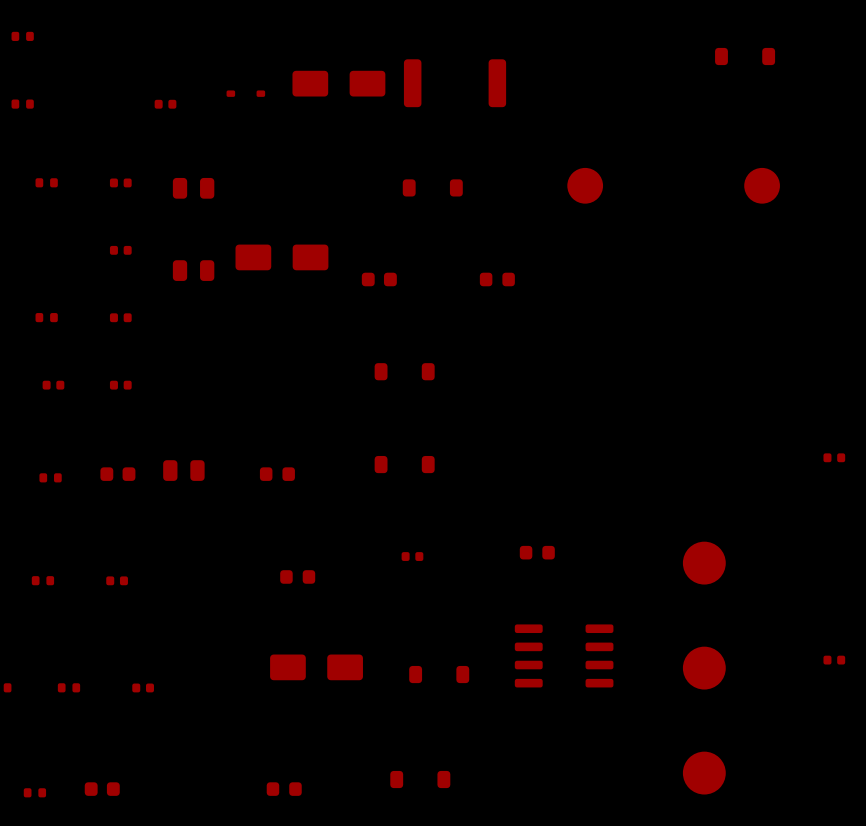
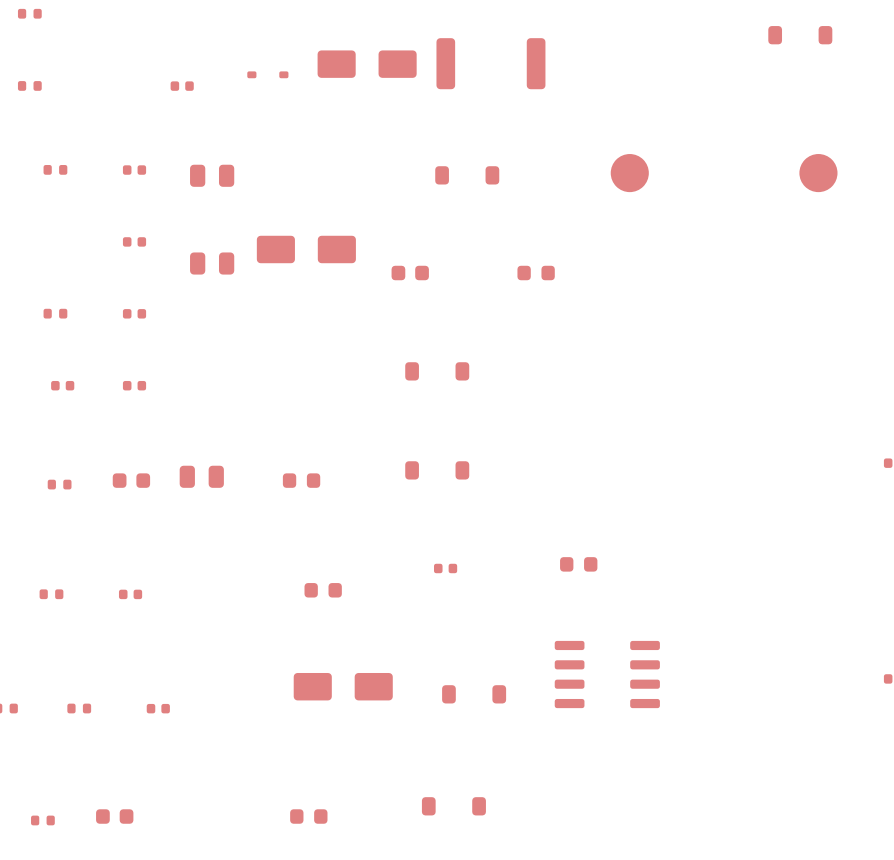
part: (704, 563) -> none
part: (704, 668) -> none
part: (704, 773) -> none

